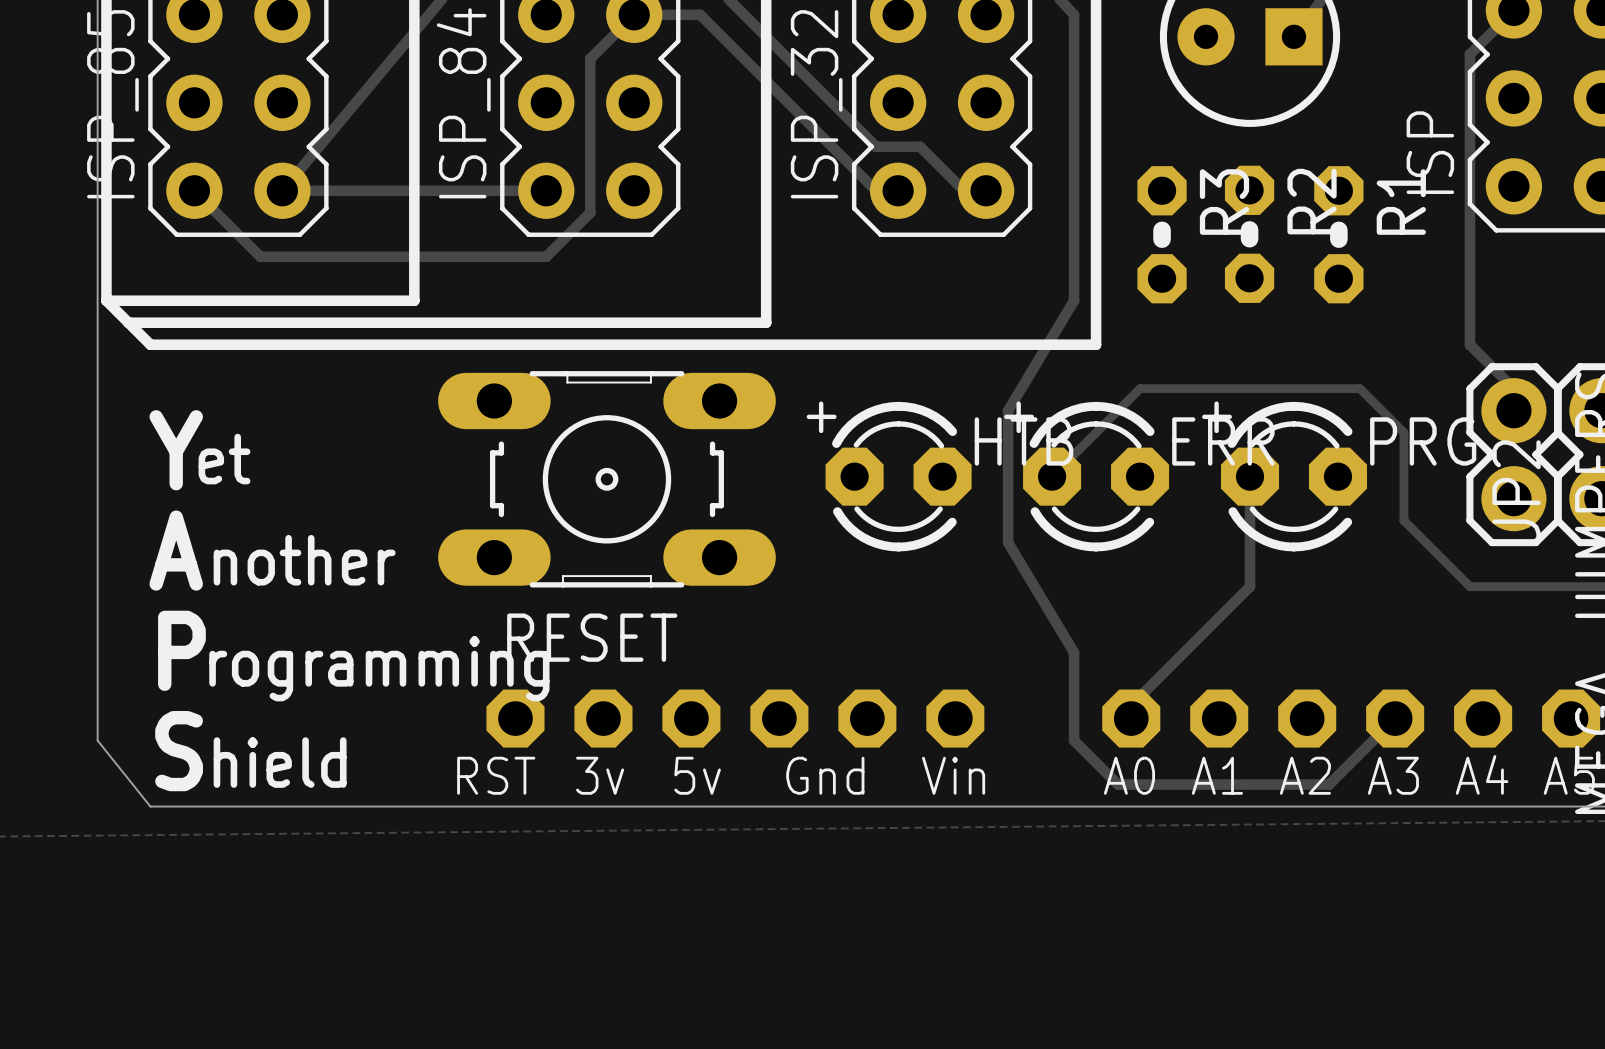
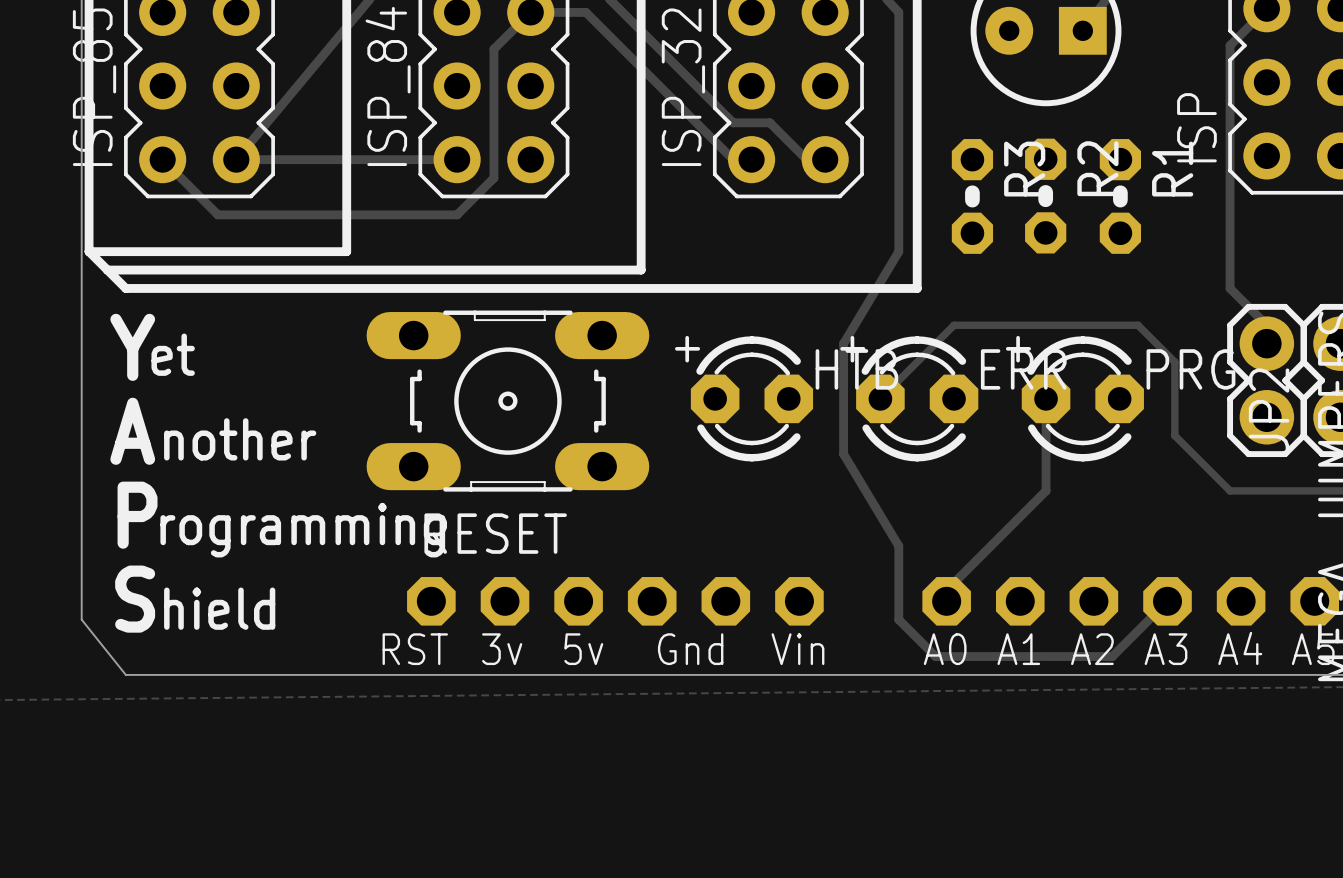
text position: Y (176, 450) -> Y (132, 347)
text position: et (224, 459) -> et (173, 354)
text position: A (176, 550) -> A (132, 431)
text position: nother (304, 560) -> nother (240, 439)
text position: P (181, 650) -> P (137, 515)
text position: rogramming (379, 668) -> rogramming (302, 530)
text position: S (179, 751) -> S (135, 599)
text position: hield (280, 762) -> hield (219, 608)

